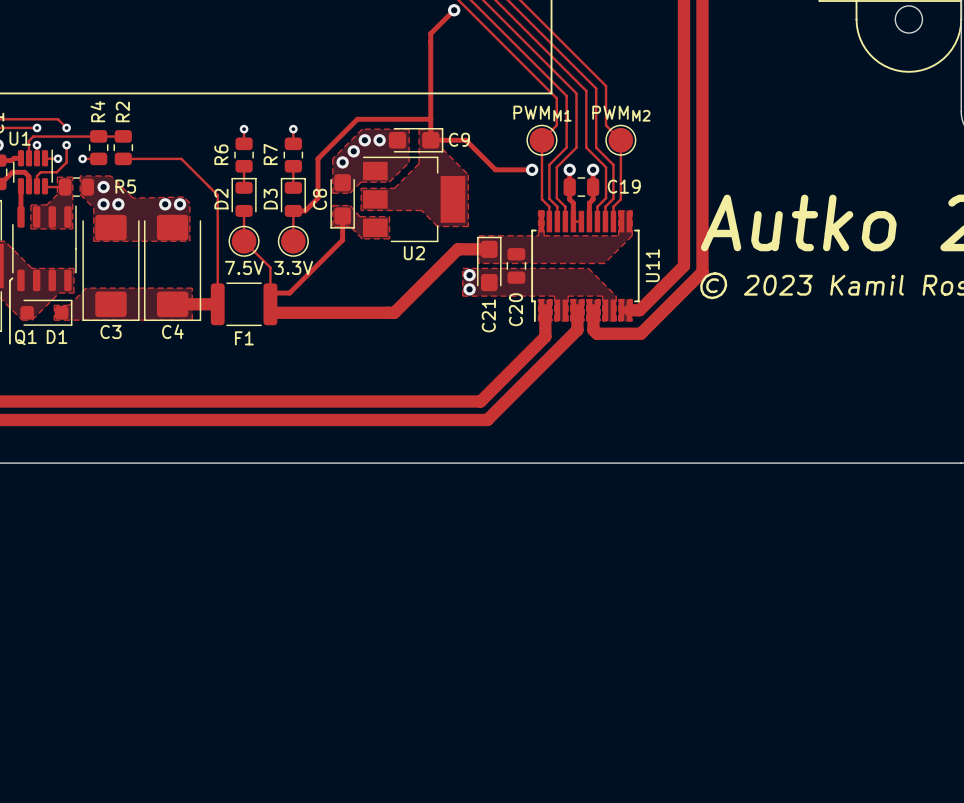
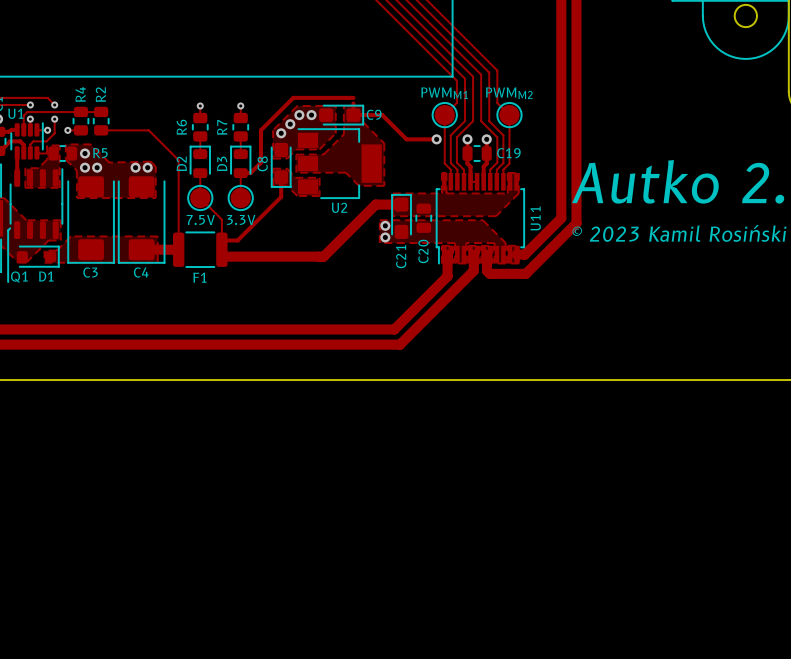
track: (454, 10) (430, 33) (430, 126) -> none
via: (454, 10) -> none

